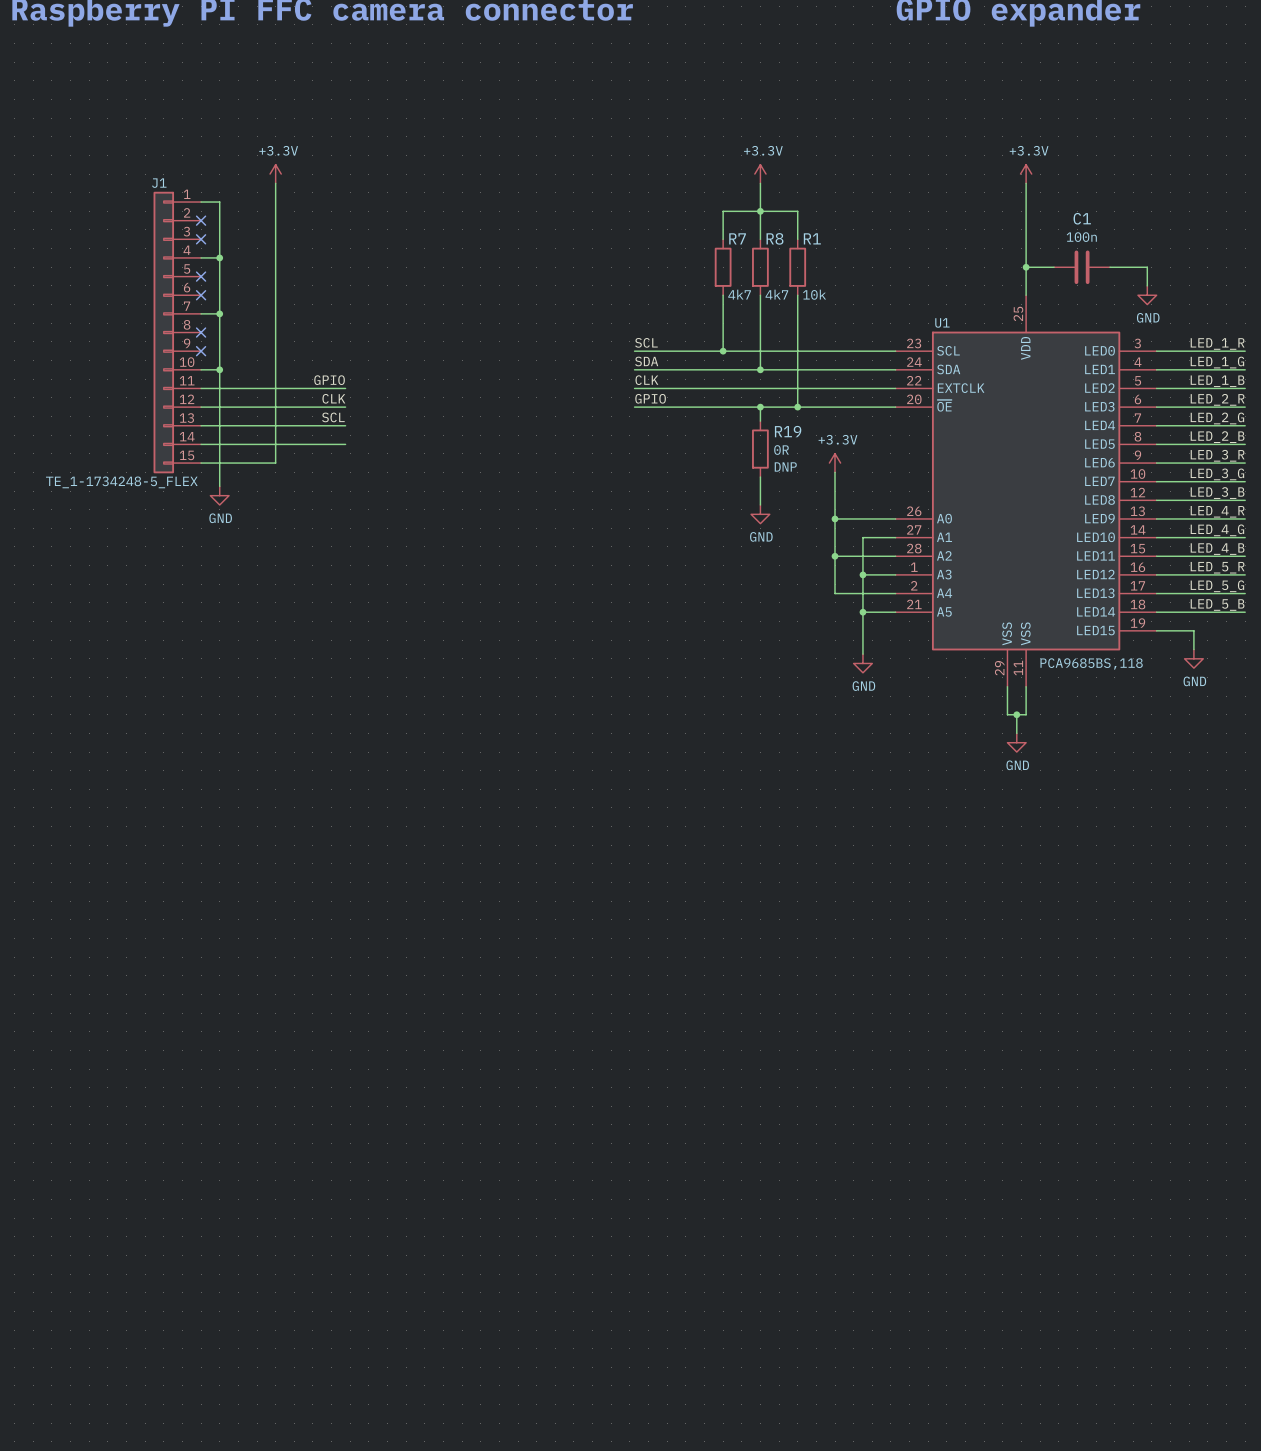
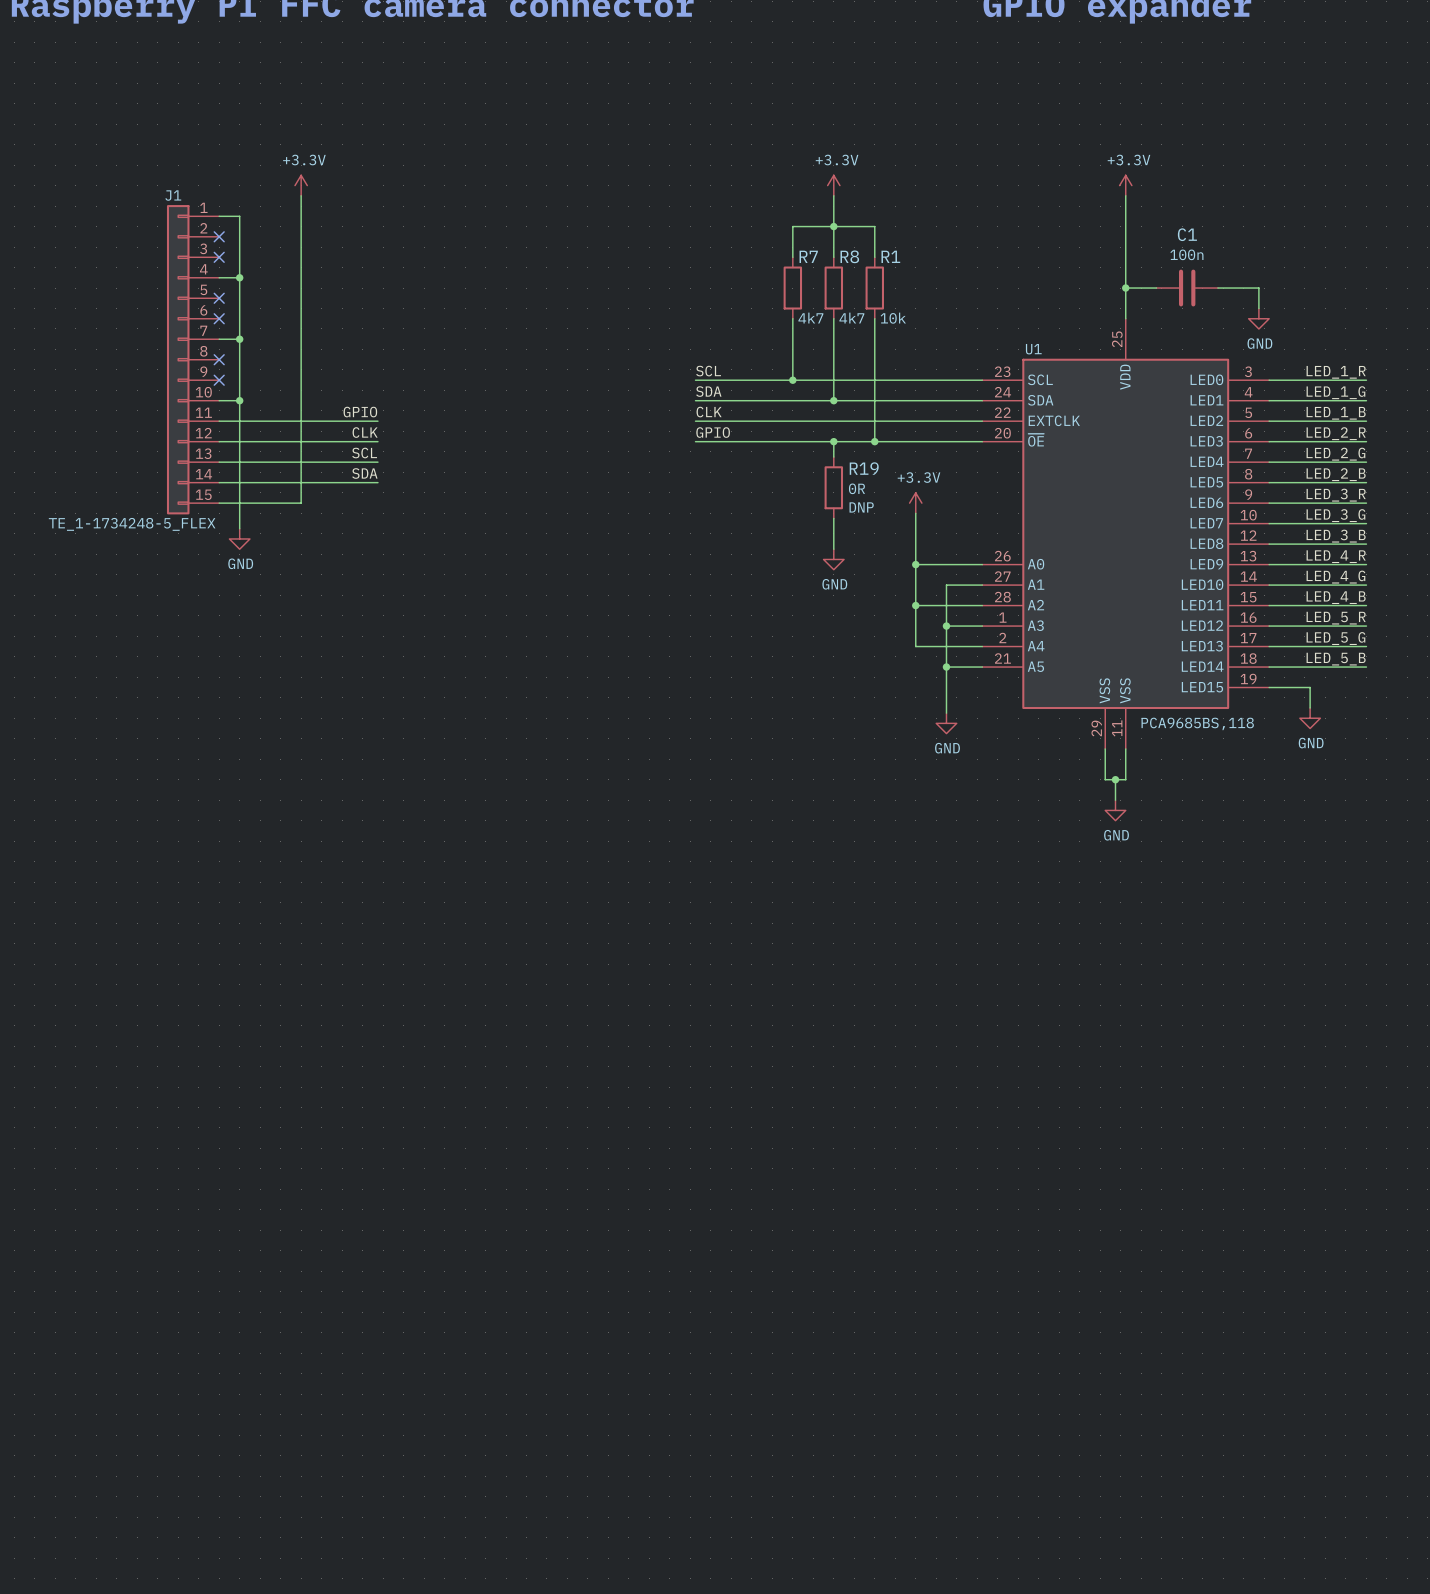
label: none -> SDA (364, 473)

